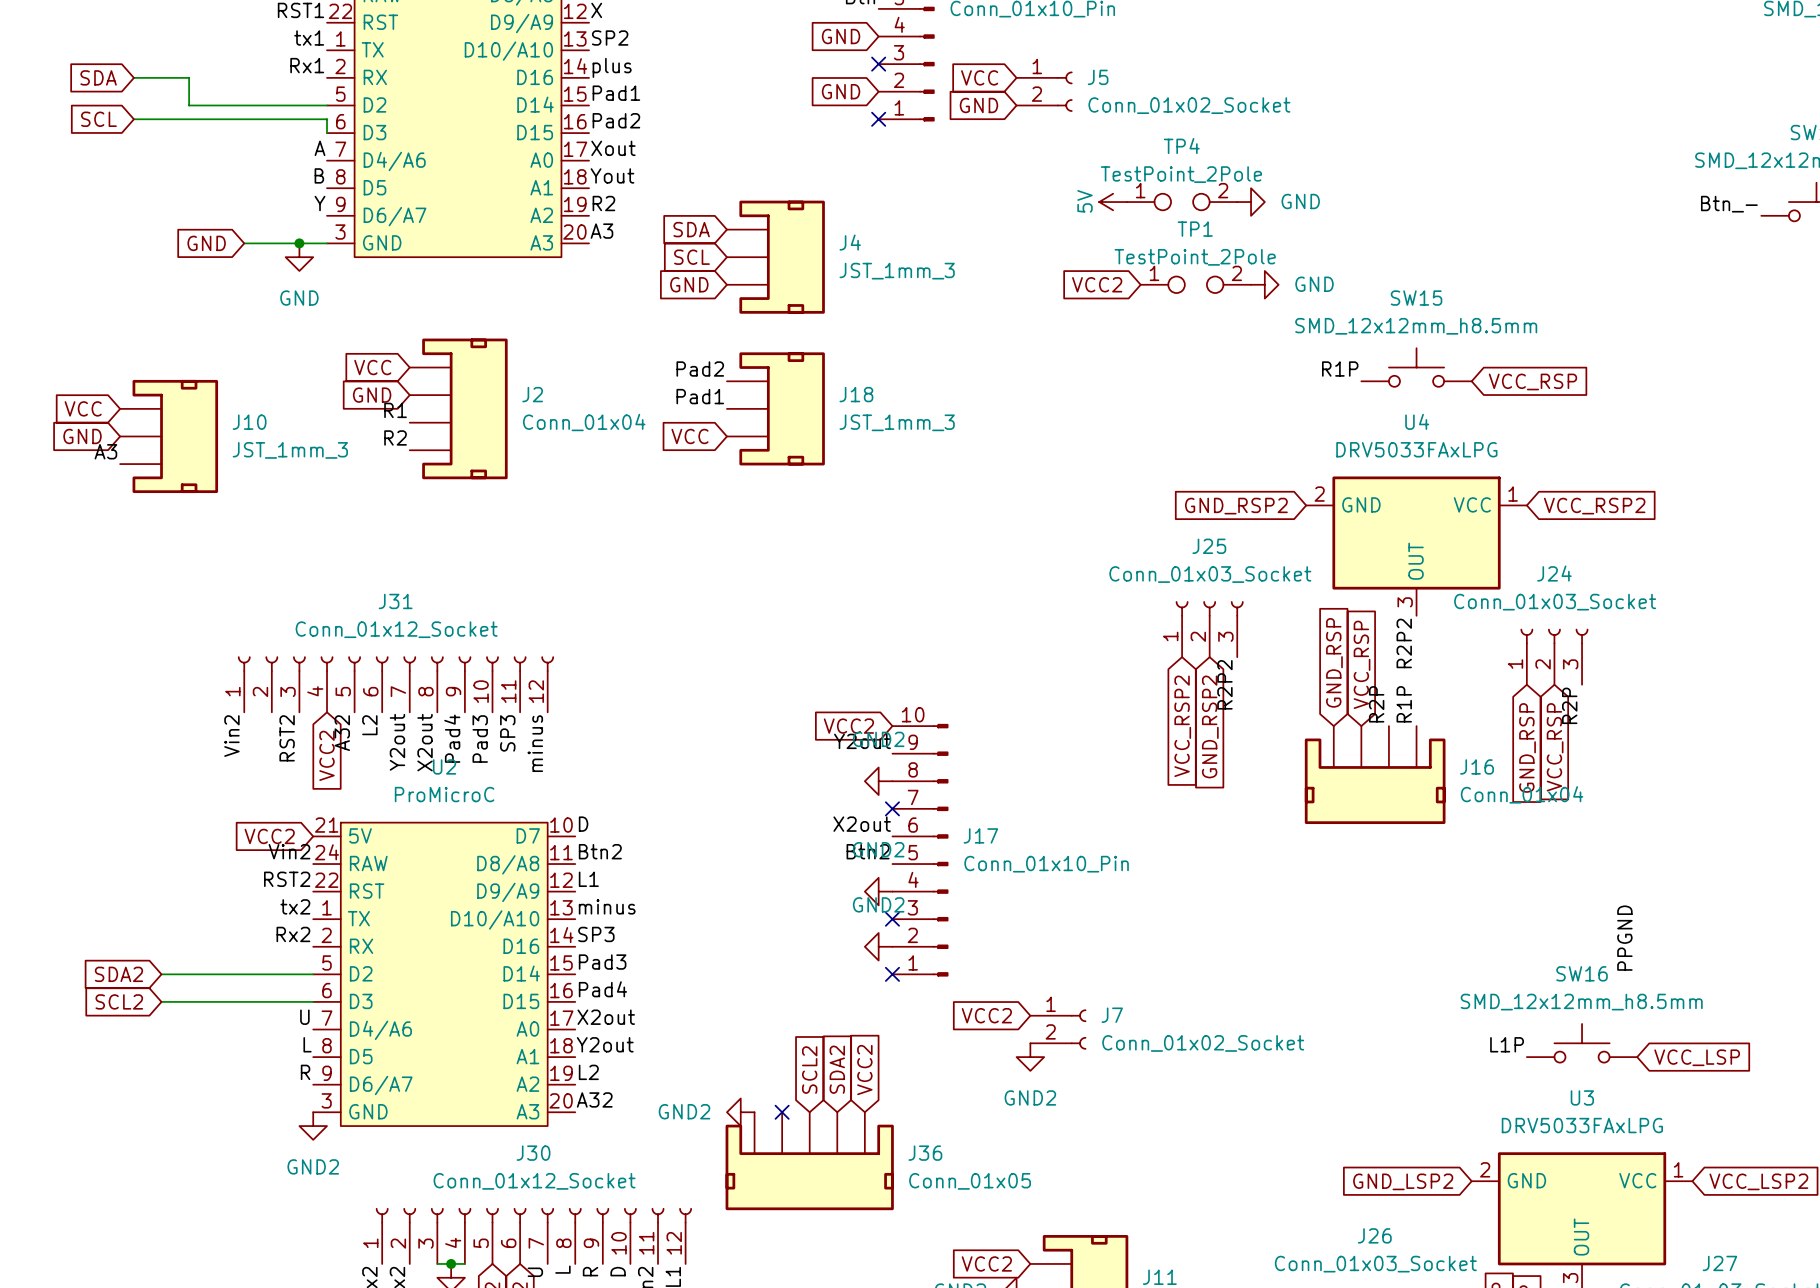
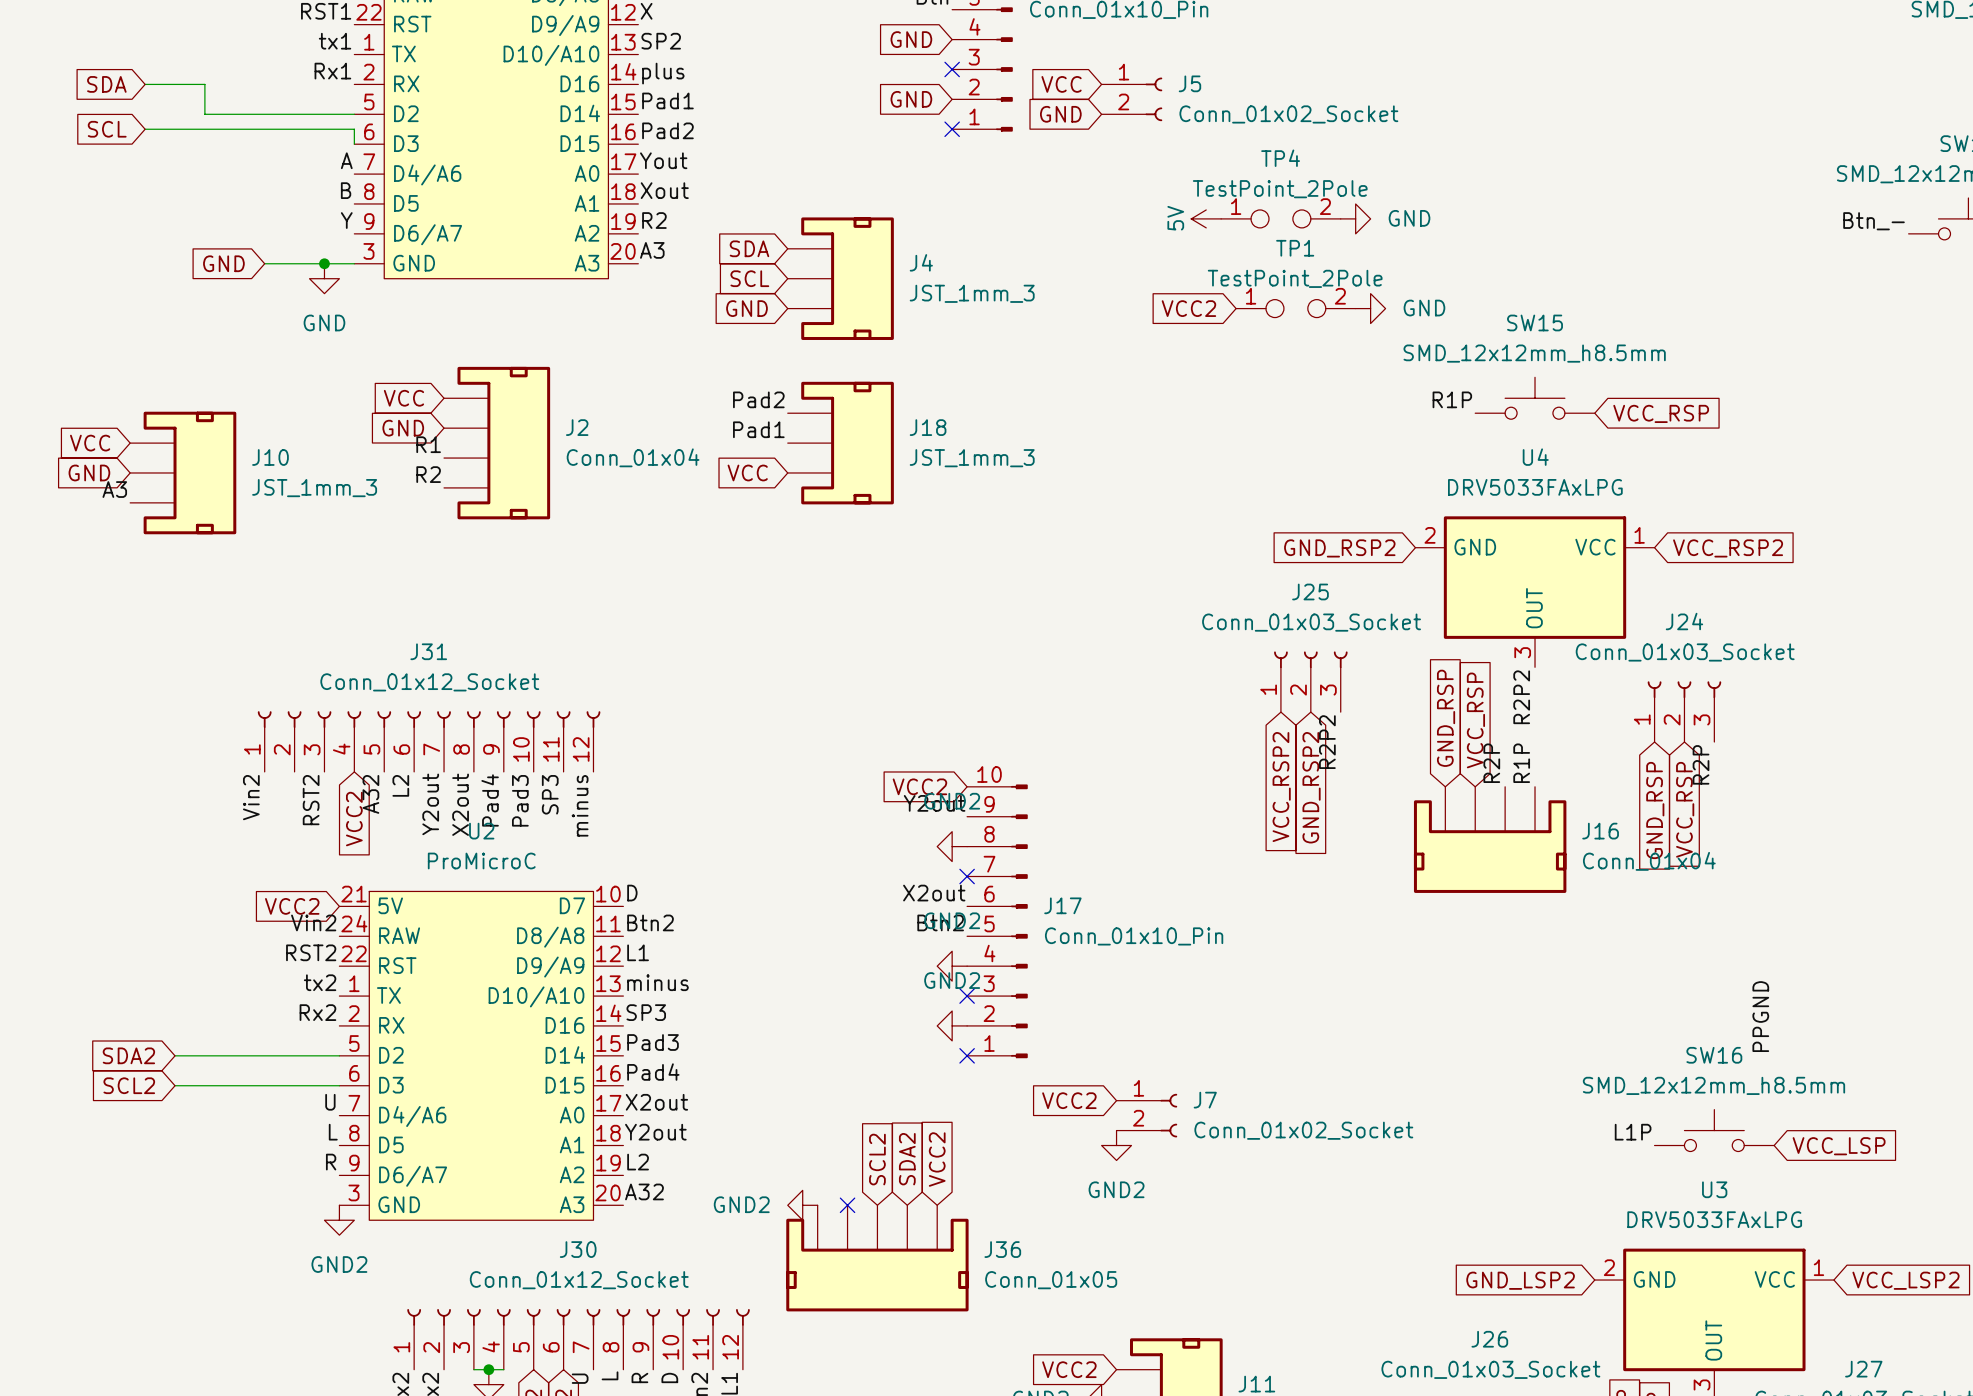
label: Xout (613, 148) -> Yout (663, 160)
label: Yout (612, 175) -> Xout (664, 190)

